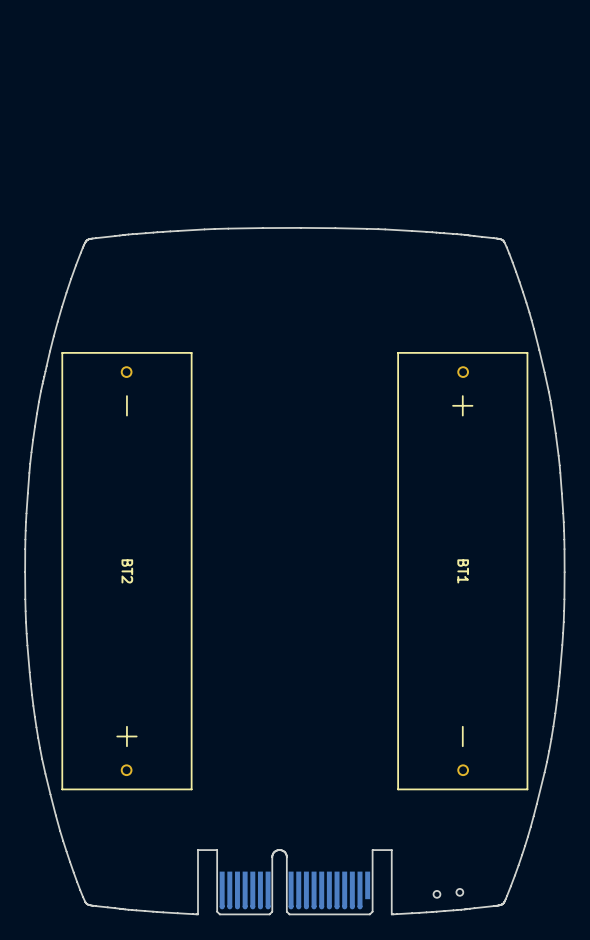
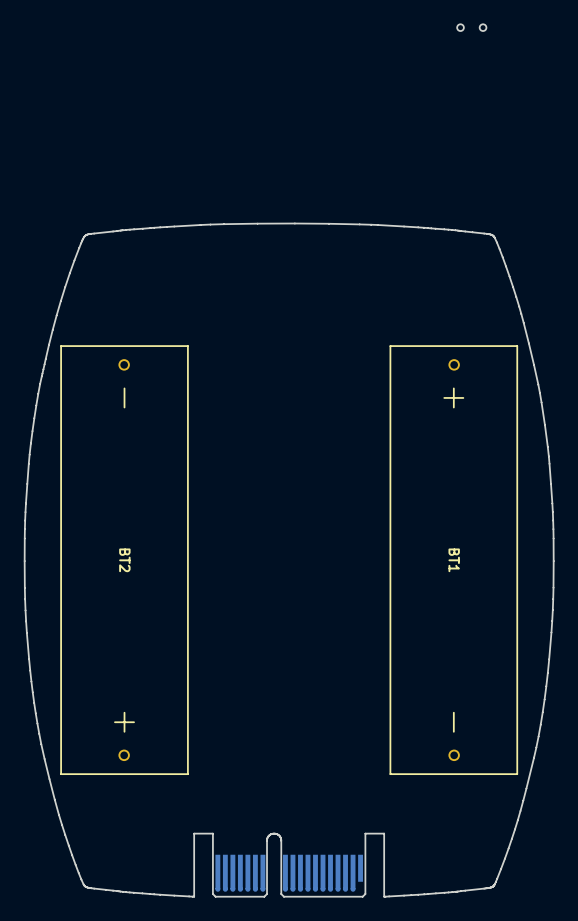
part: none -> (471, 27)
part: (448, 893) -> none

